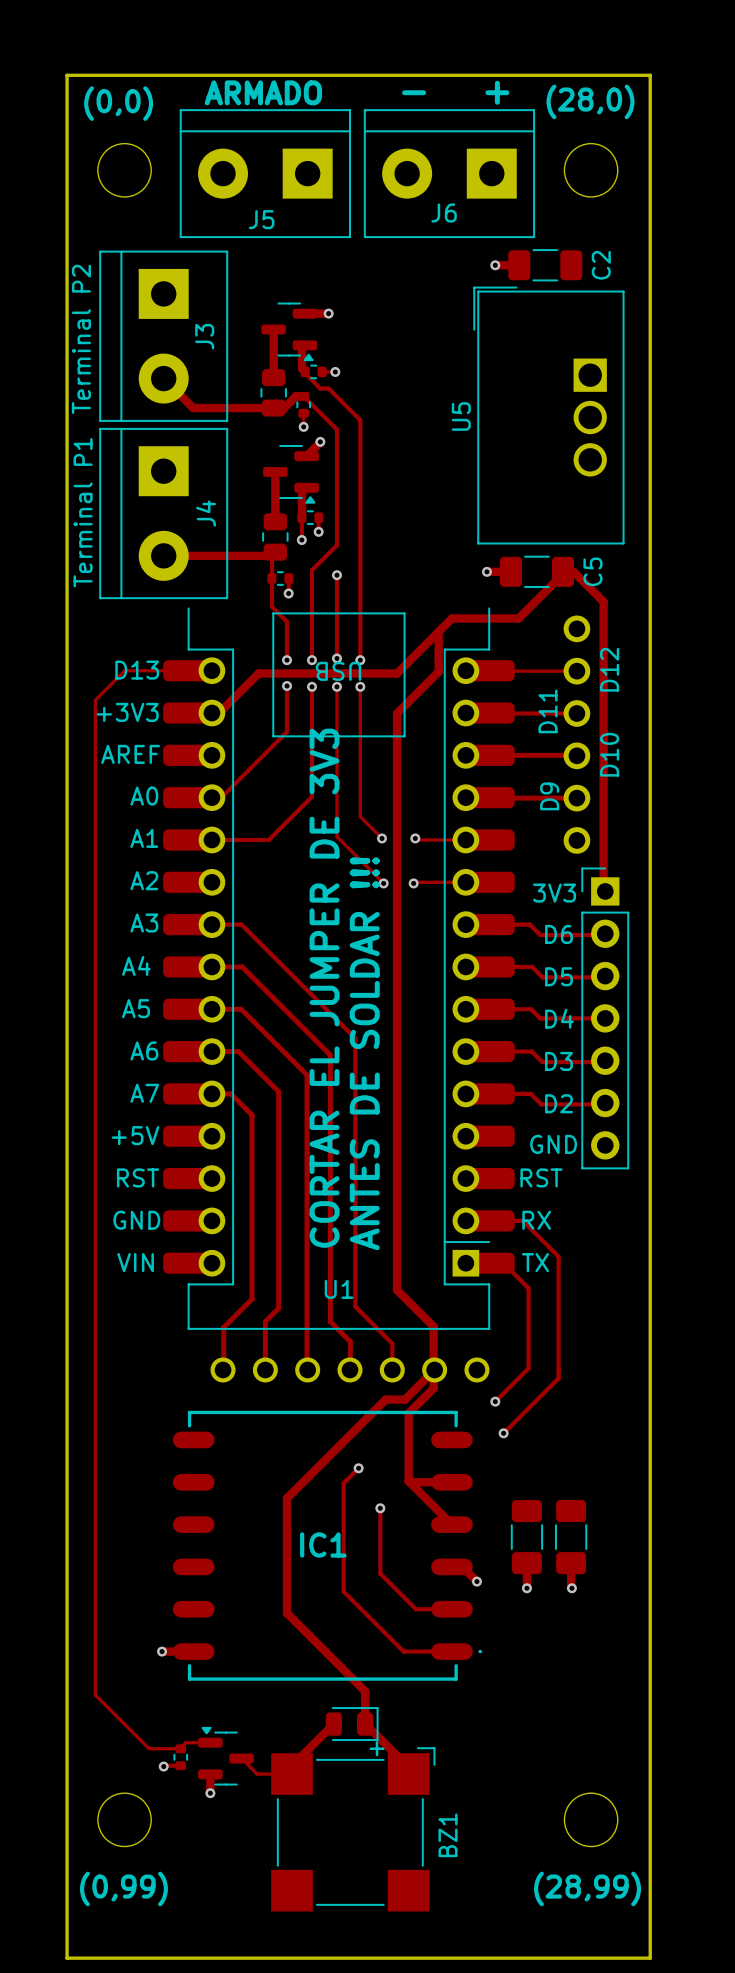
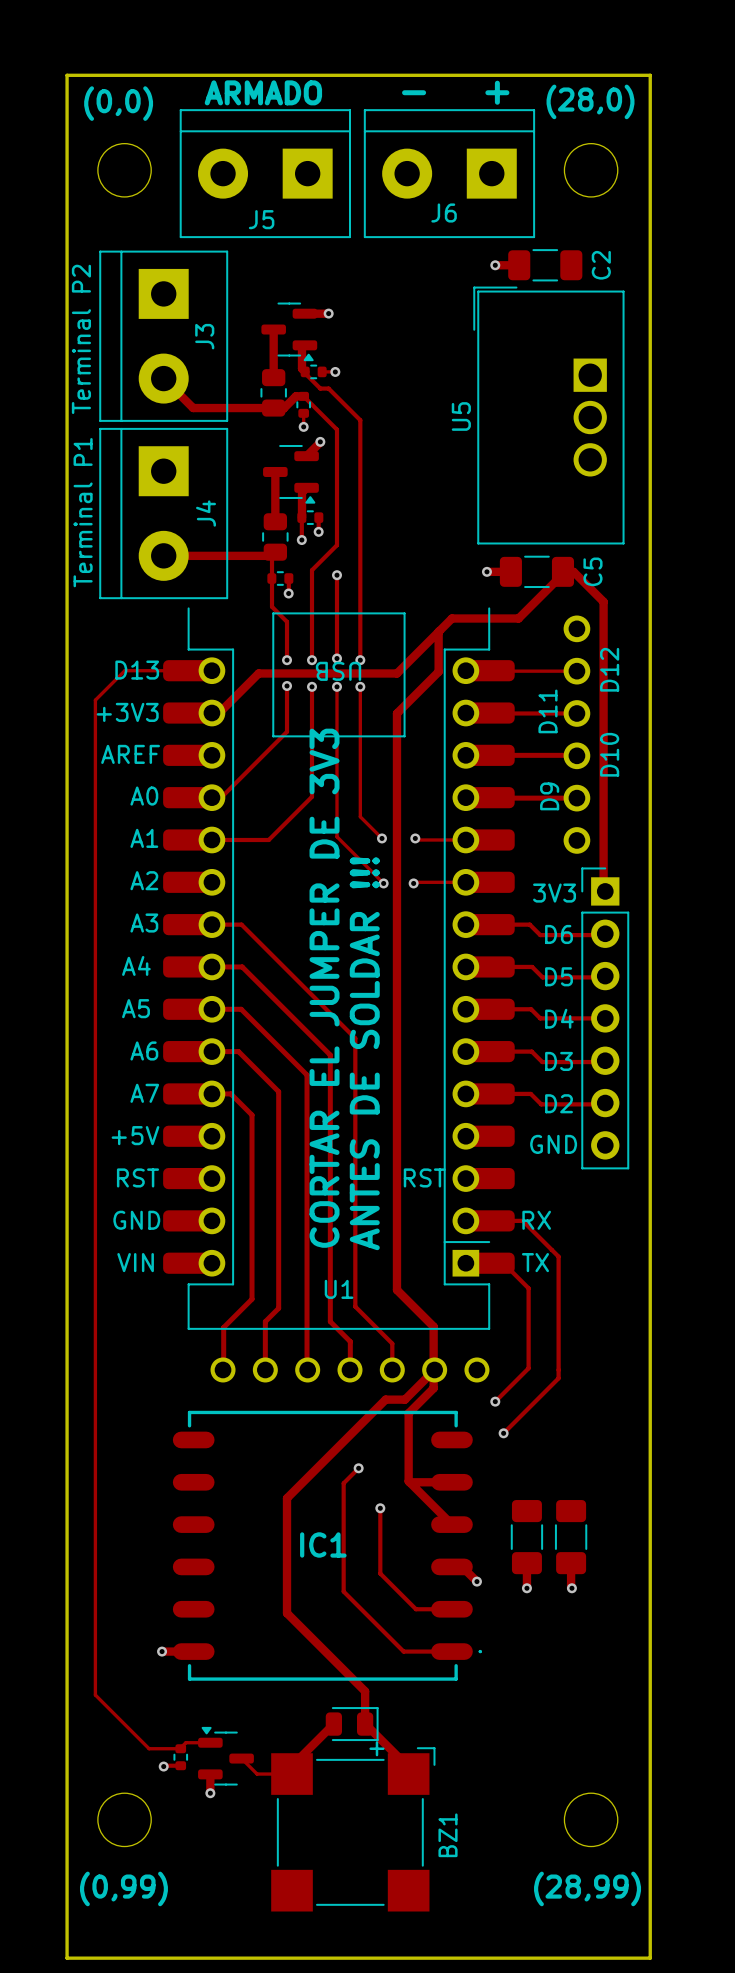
U1 text position: RST (541, 1177) -> RST (424, 1177)

